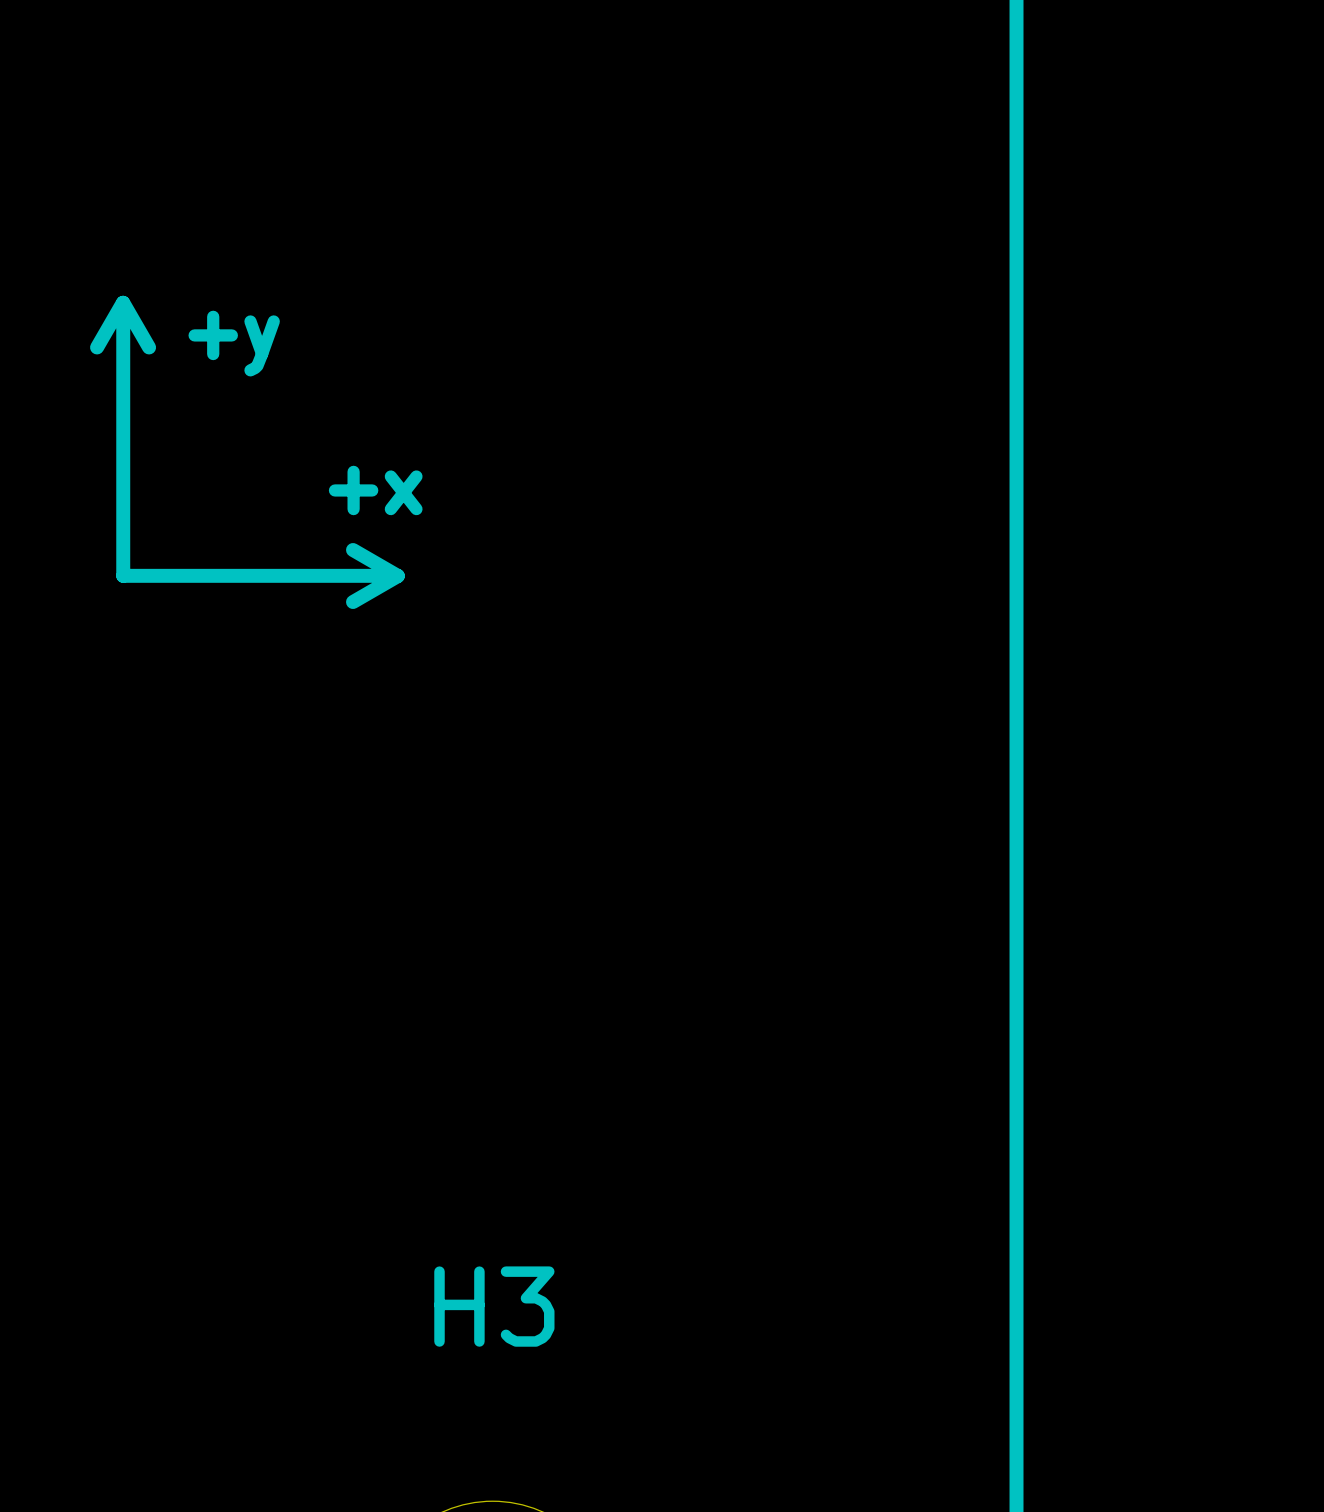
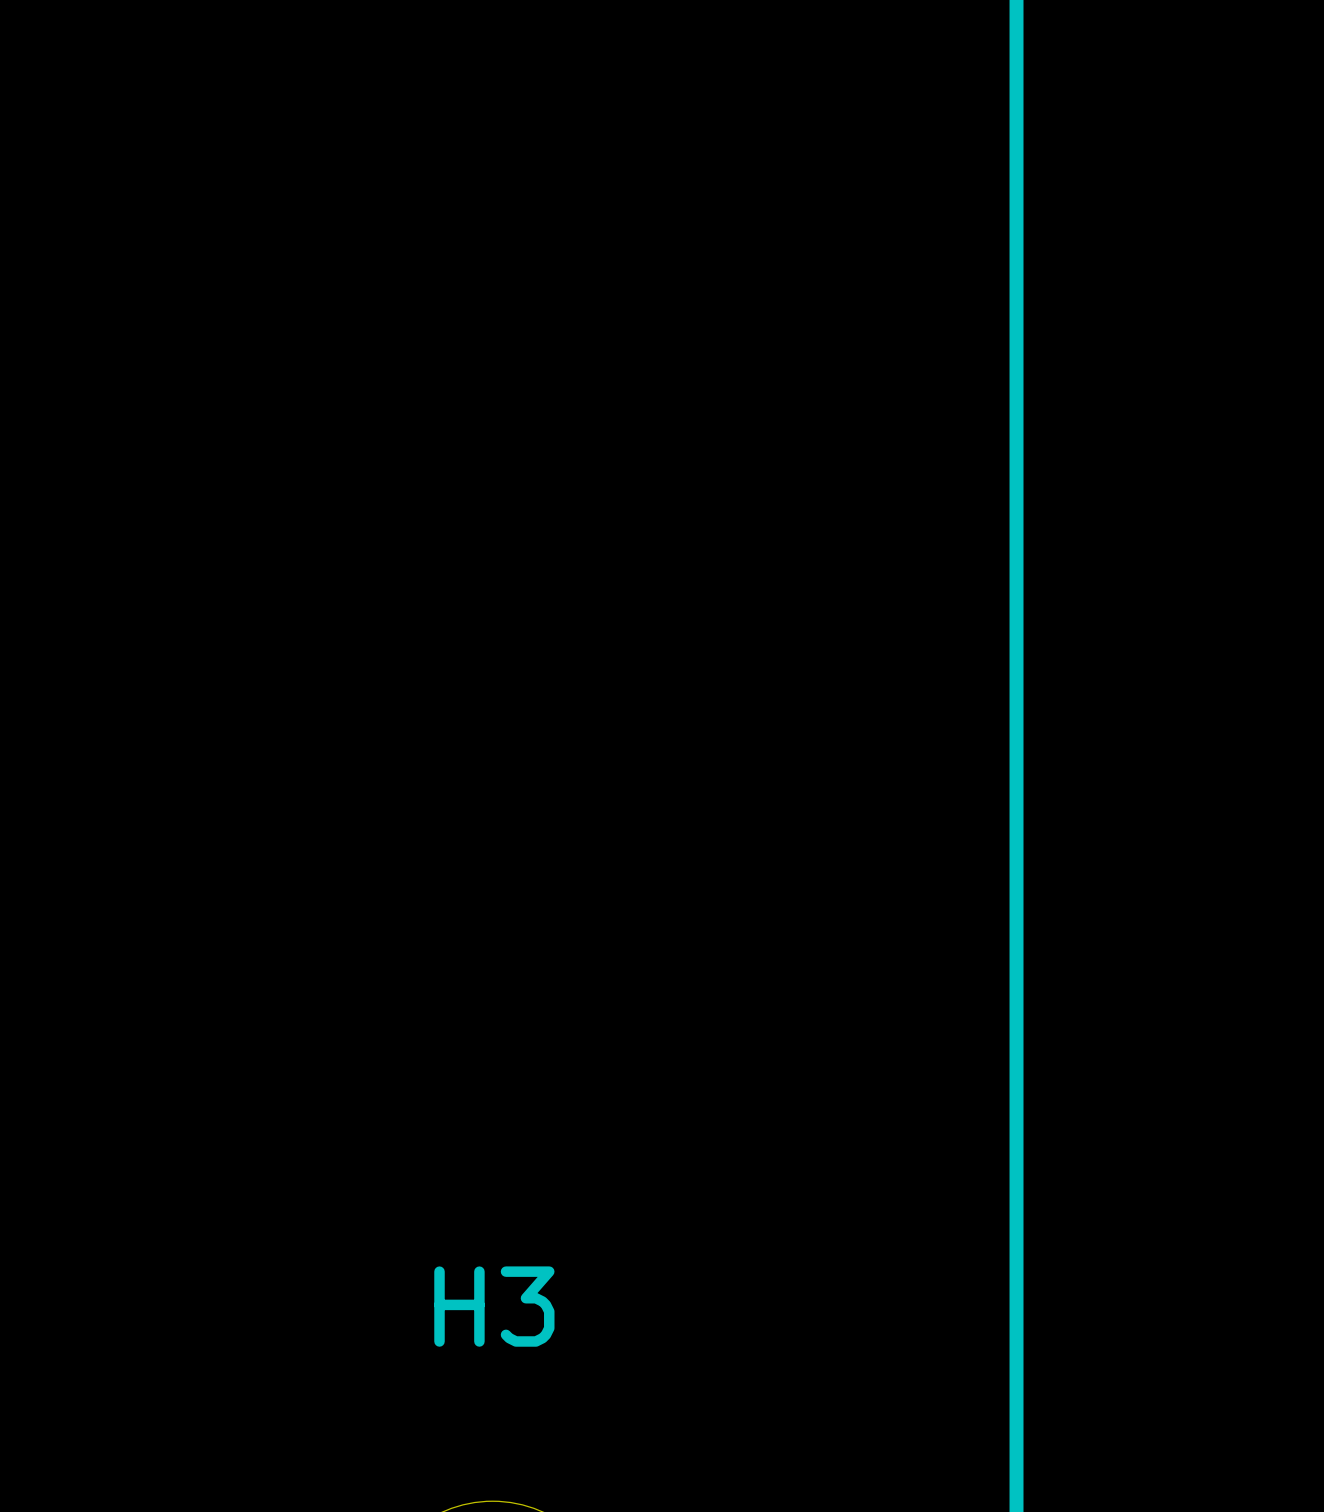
line: (122, 302) (97, 347) -> none
line: (123, 302) (149, 347) -> none
line: (123, 304) (123, 575) (397, 575) -> none
text: +y (234, 343) -> none
text: +x (375, 490) -> none
line: (353, 550) (397, 575) -> none
line: (397, 576) (353, 602) -> none

